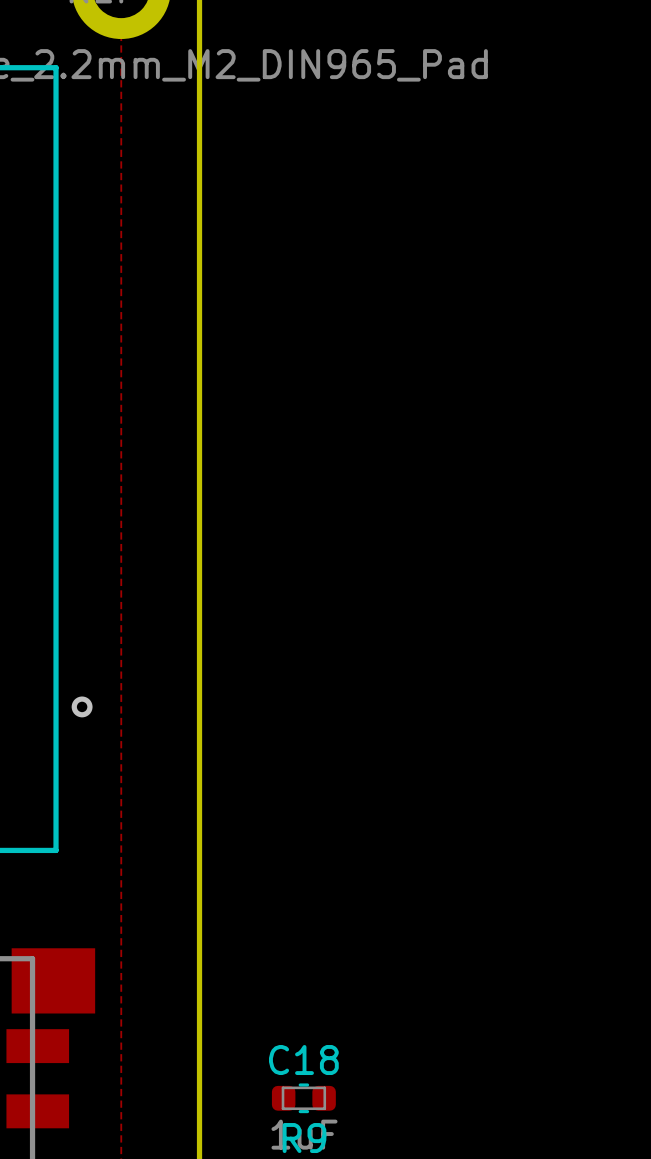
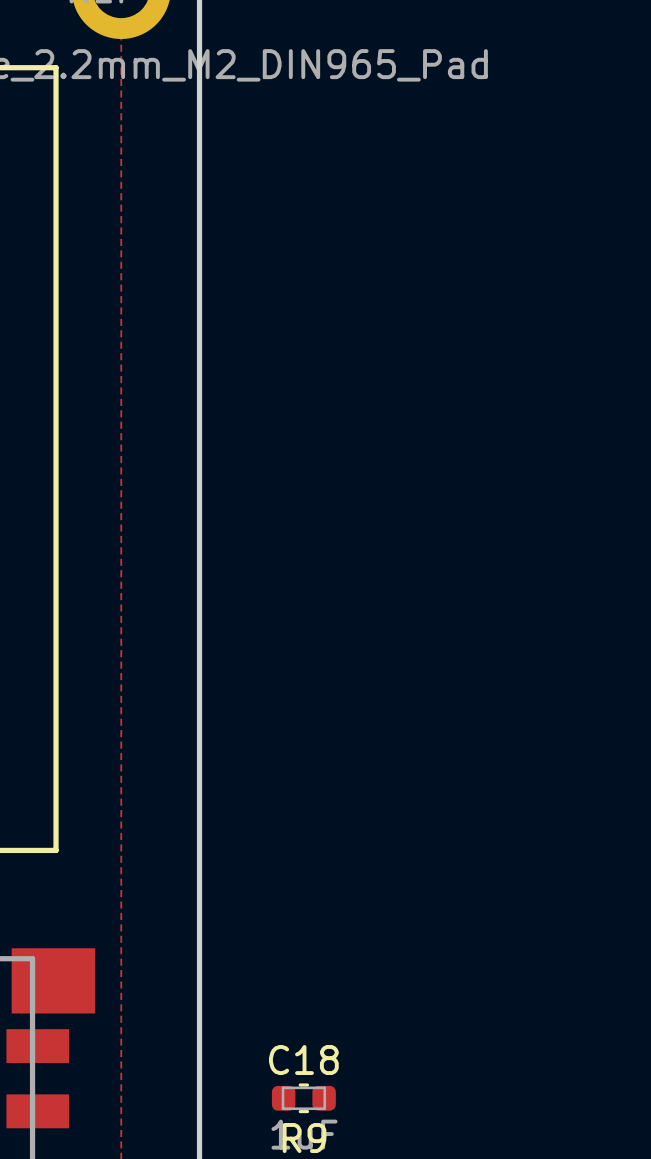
via: (82, 706) -> none

